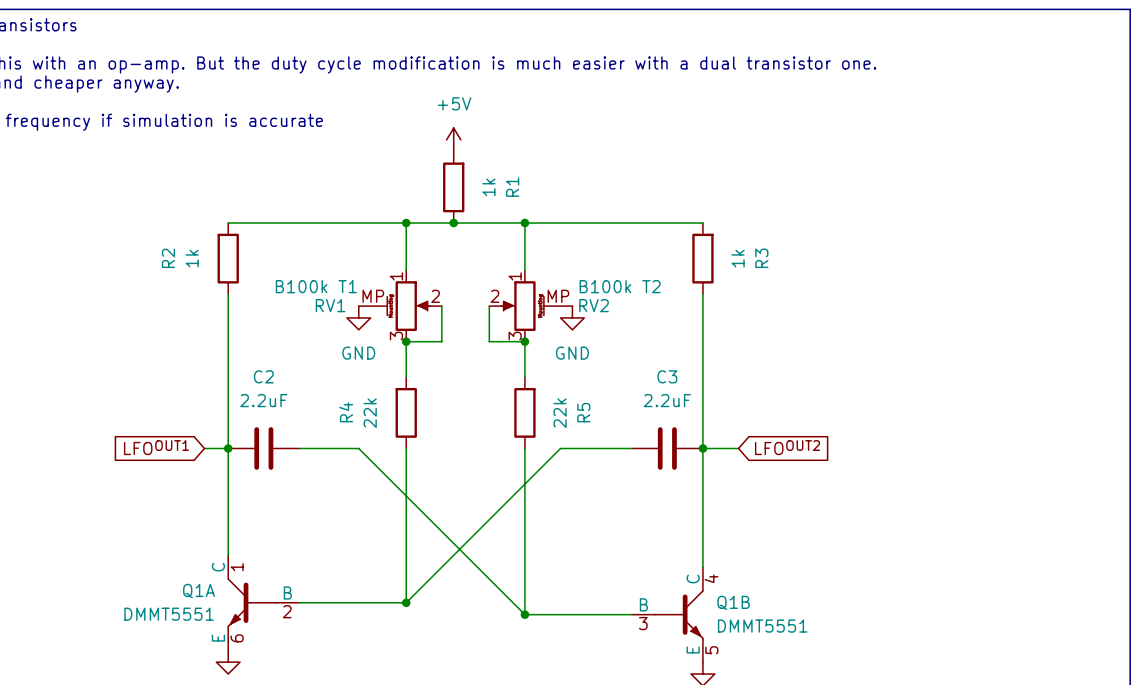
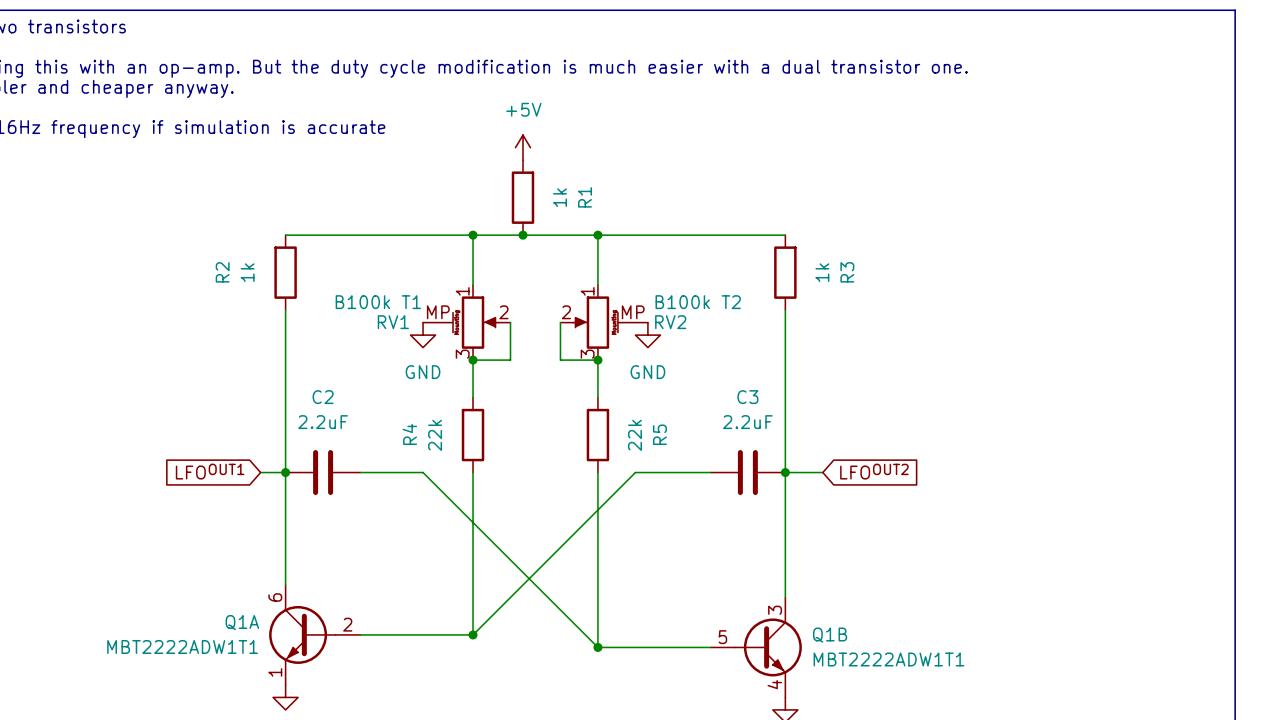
Q1A symbol: [228, 555, 300, 651] -> [269, 584, 361, 685]
Q1B symbol: [631, 567, 703, 663] -> [710, 597, 802, 698]
Q1A value: DMMT5551 (169, 614) -> MBT2222ADW1T1 (182, 646)
Q1B value: DMMT5551 (762, 626) -> MBT2222ADW1T1 (888, 659)

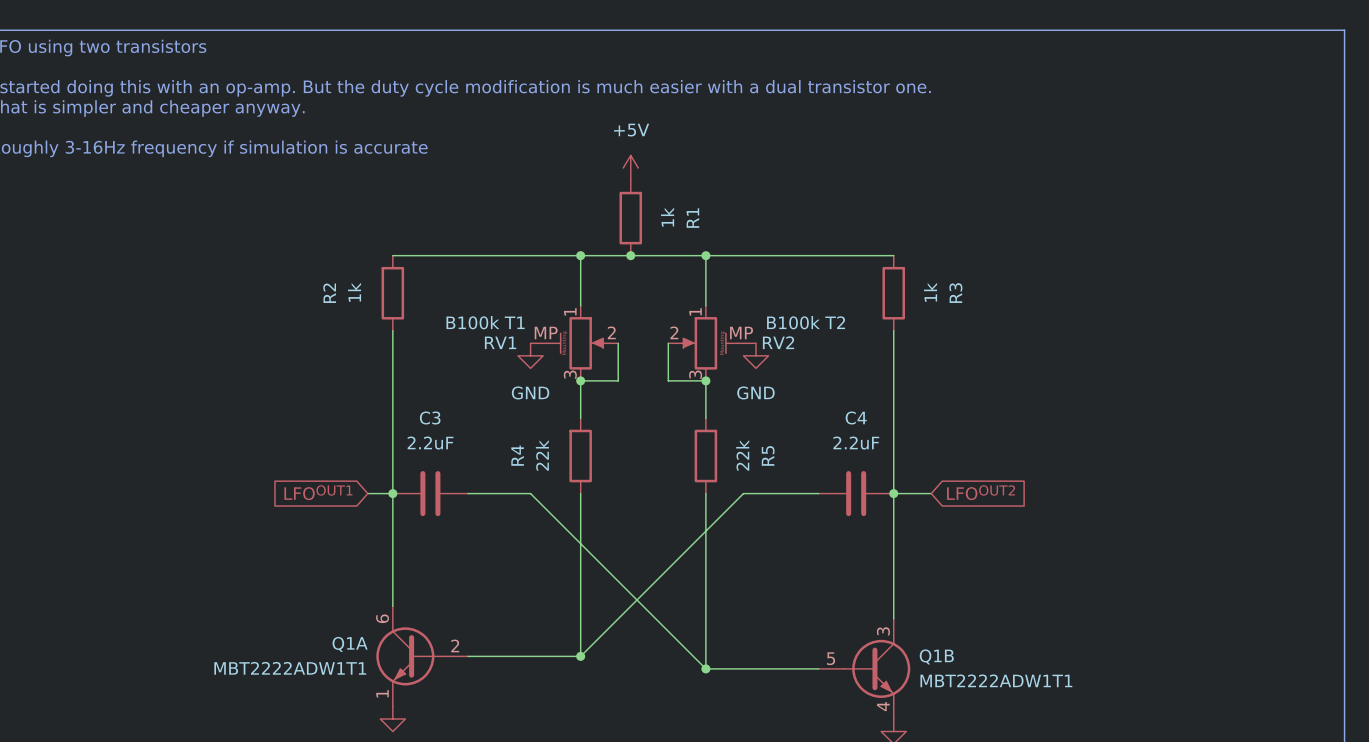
C2 name: C2 (323, 397) -> C3 (430, 417)
C3 name: C3 (747, 397) -> C4 (856, 417)

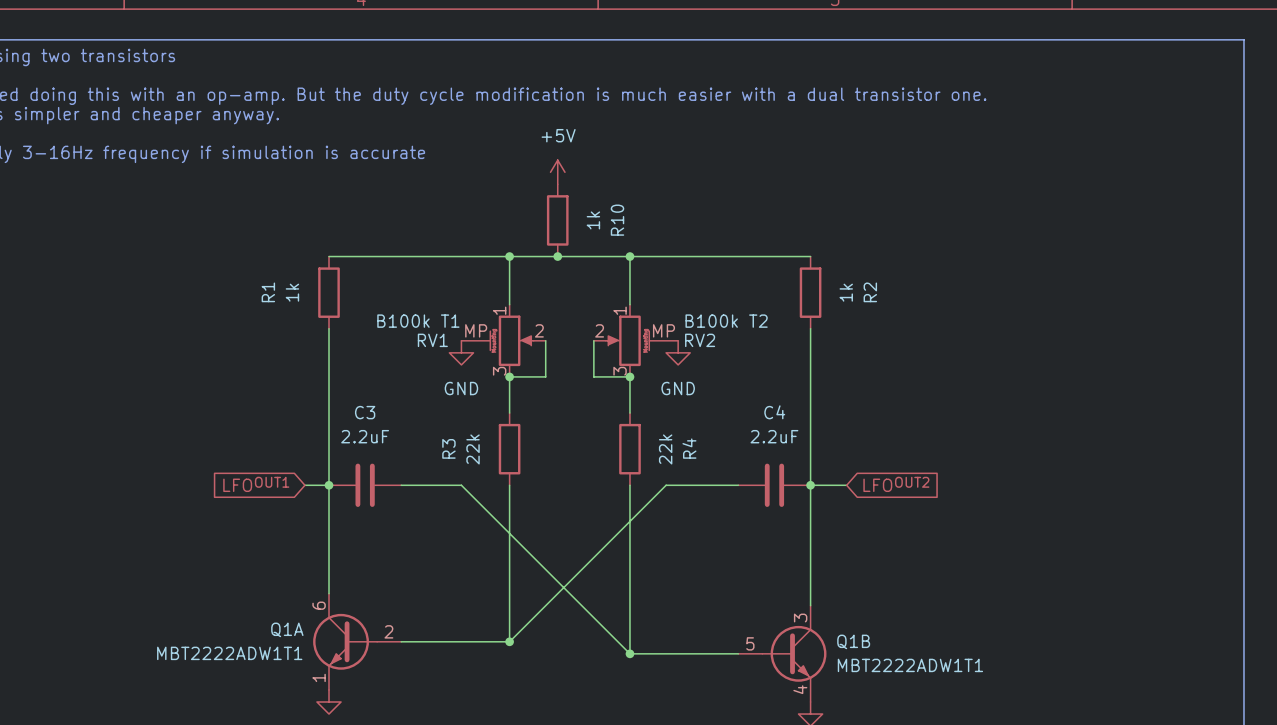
R1 name: R1 (692, 218) -> R10 (617, 220)
R2 name: R2 (329, 293) -> R1 (268, 292)
R3 name: R3 (955, 293) -> R2 (870, 292)
R4 name: R4 (517, 455) -> R3 (448, 448)
R5 name: R5 (768, 455) -> R4 (689, 448)

